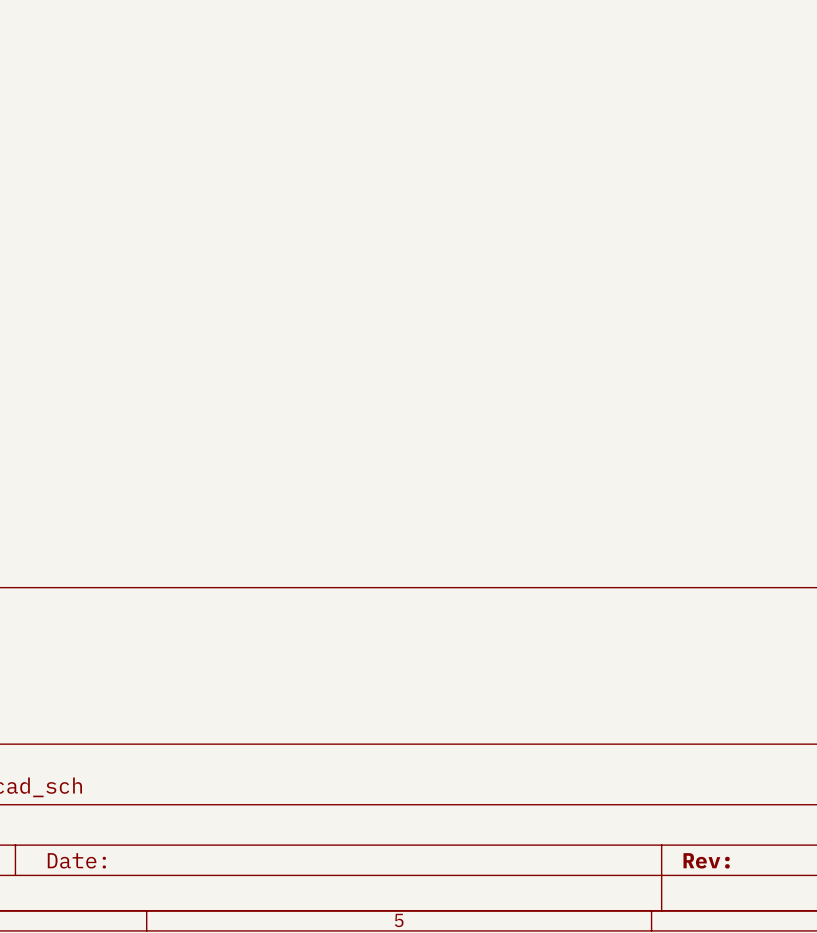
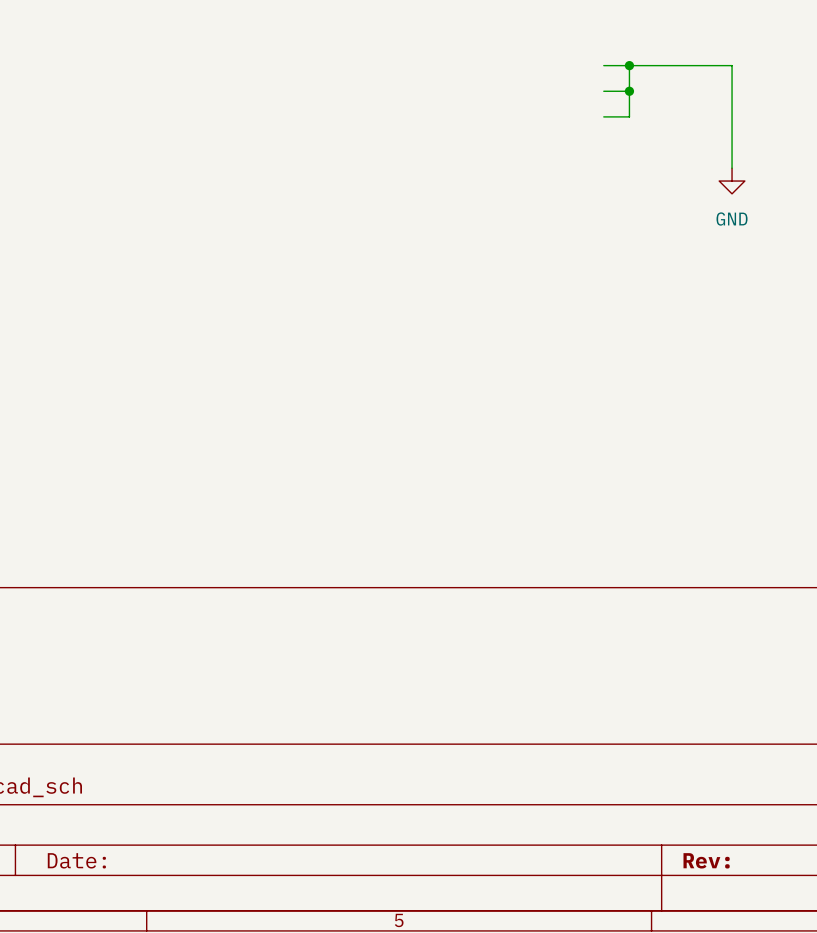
wire: none -> (603, 65) (732, 65) (732, 168)
wire: none -> (629, 65) (629, 116) (603, 116)
junction: none -> (629, 65)
wire: none -> (603, 91) (629, 91)
junction: none -> (629, 91)
power symbol: none -> GND (732, 181)

